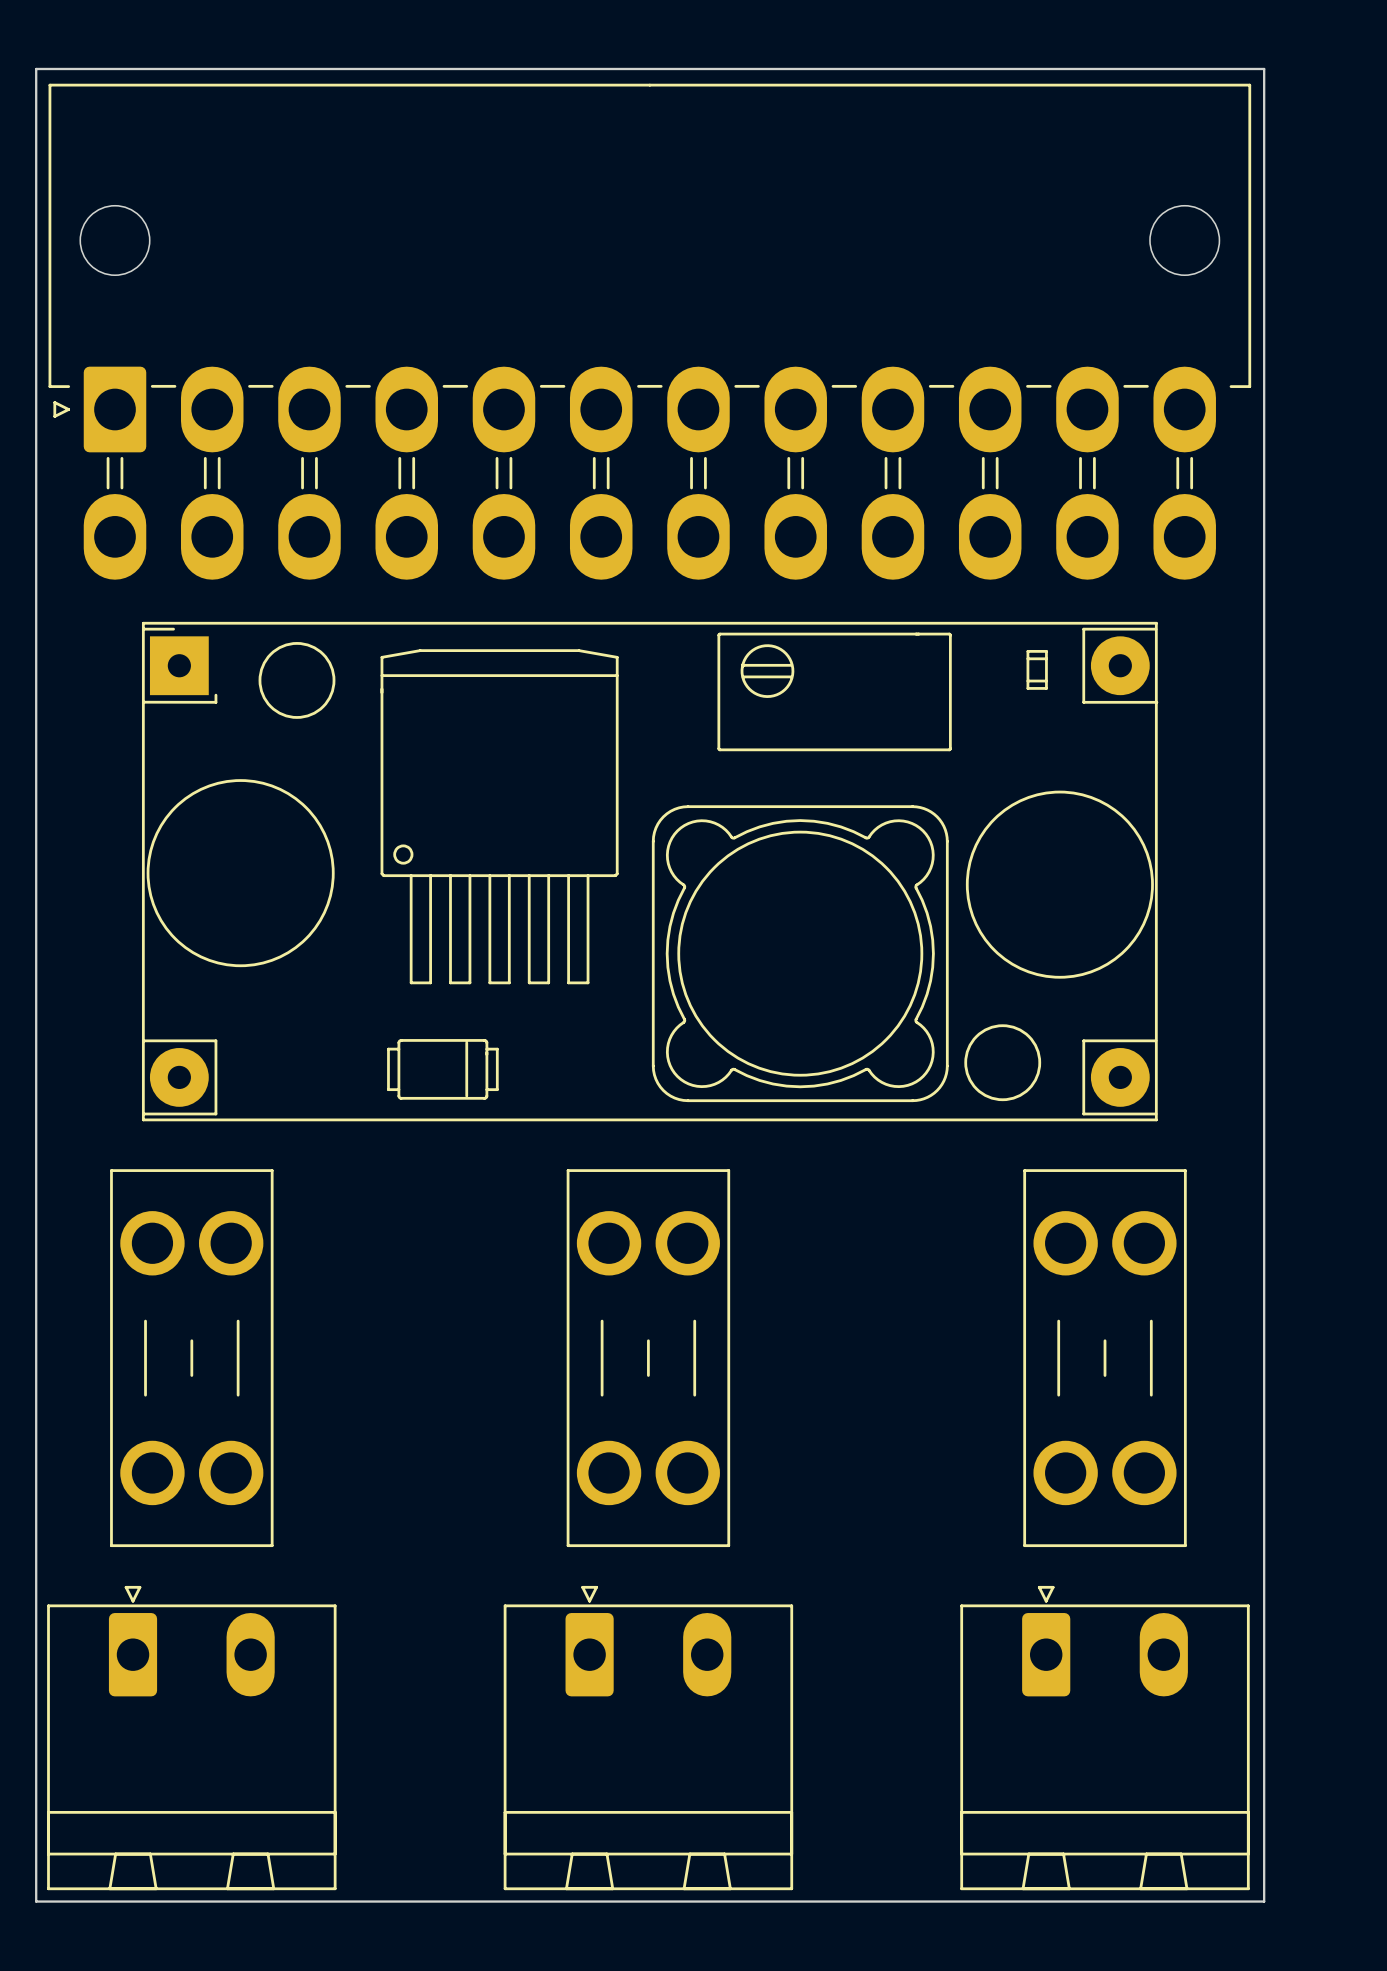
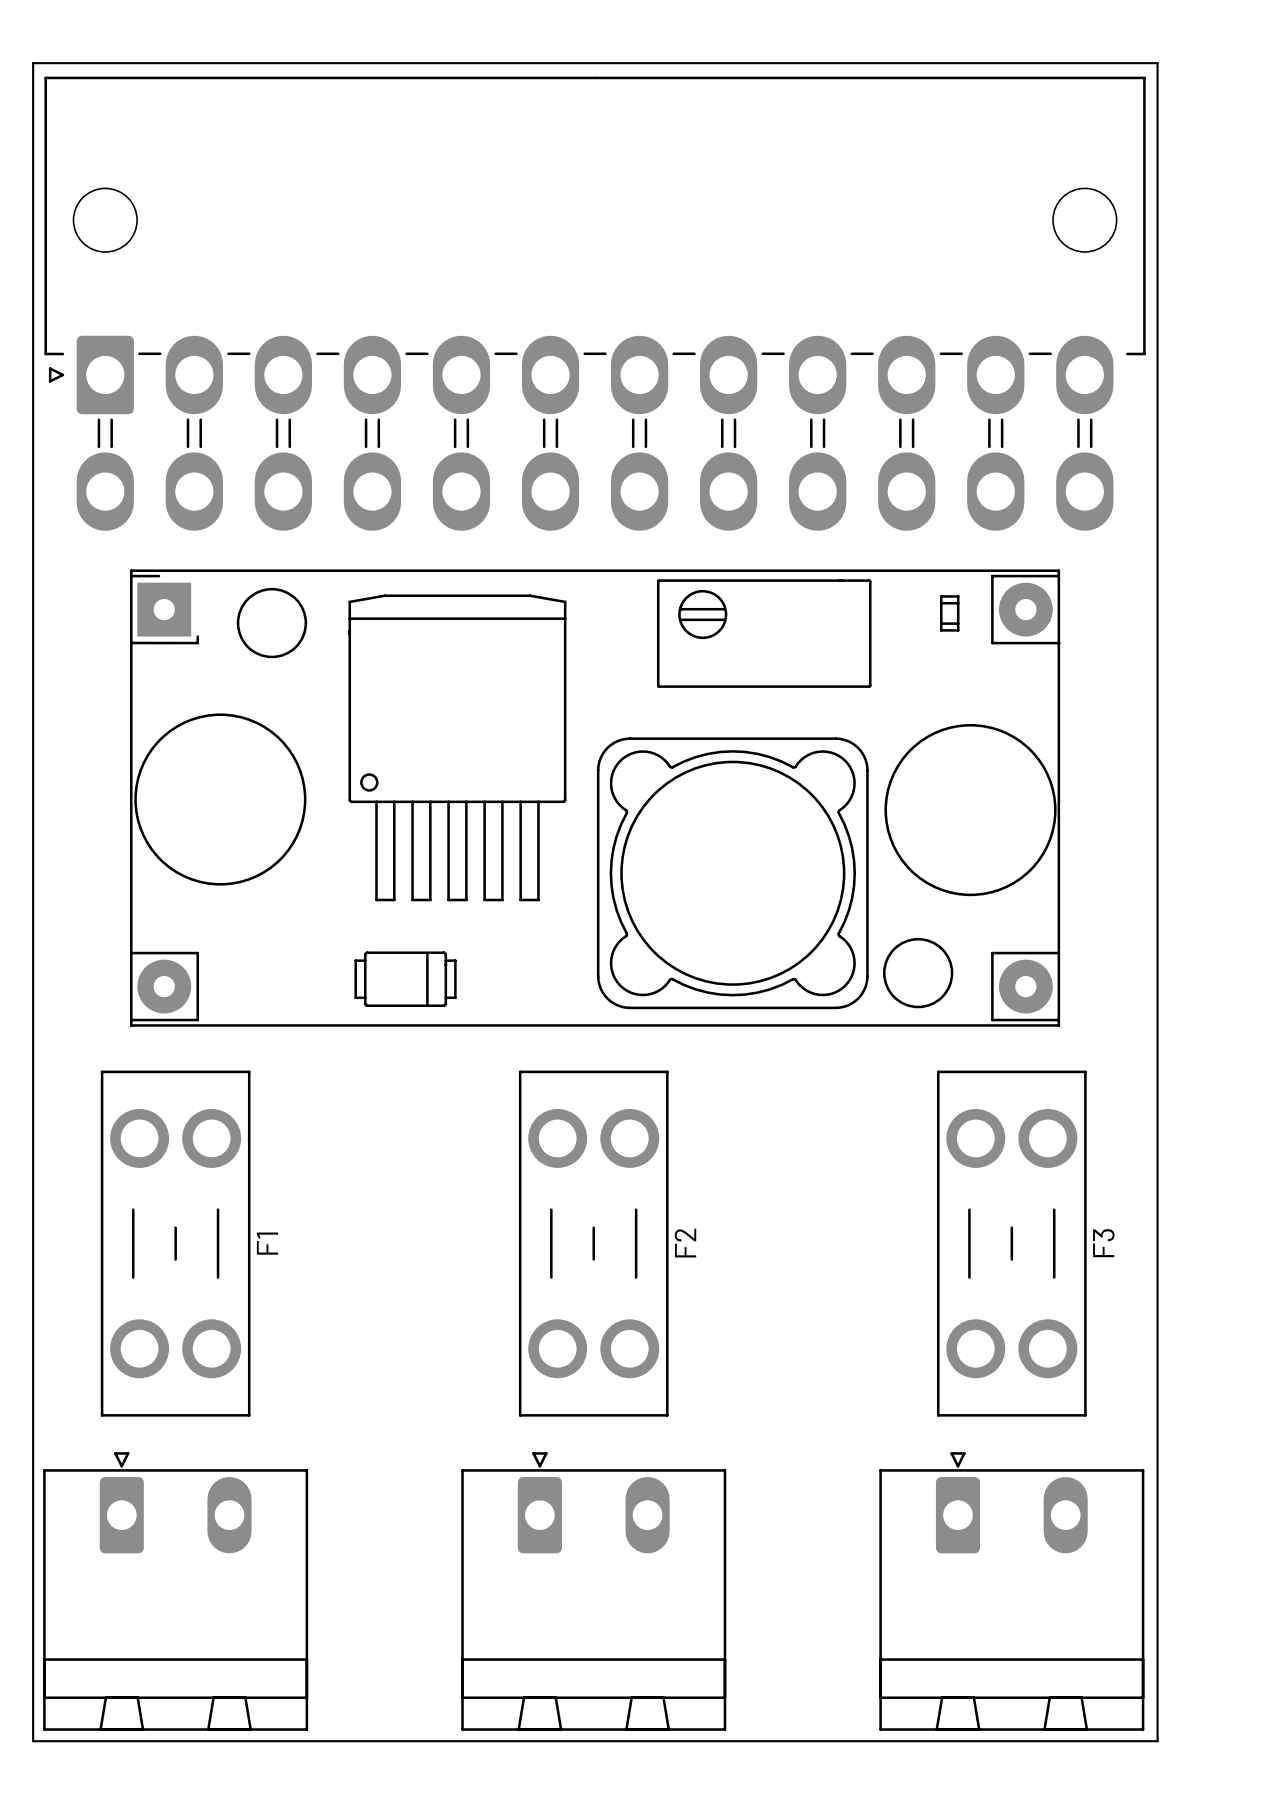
F1 name: none -> F1 (267, 1243)
F2 name: none -> F2 (685, 1243)
F3 name: none -> F3 (1103, 1243)

